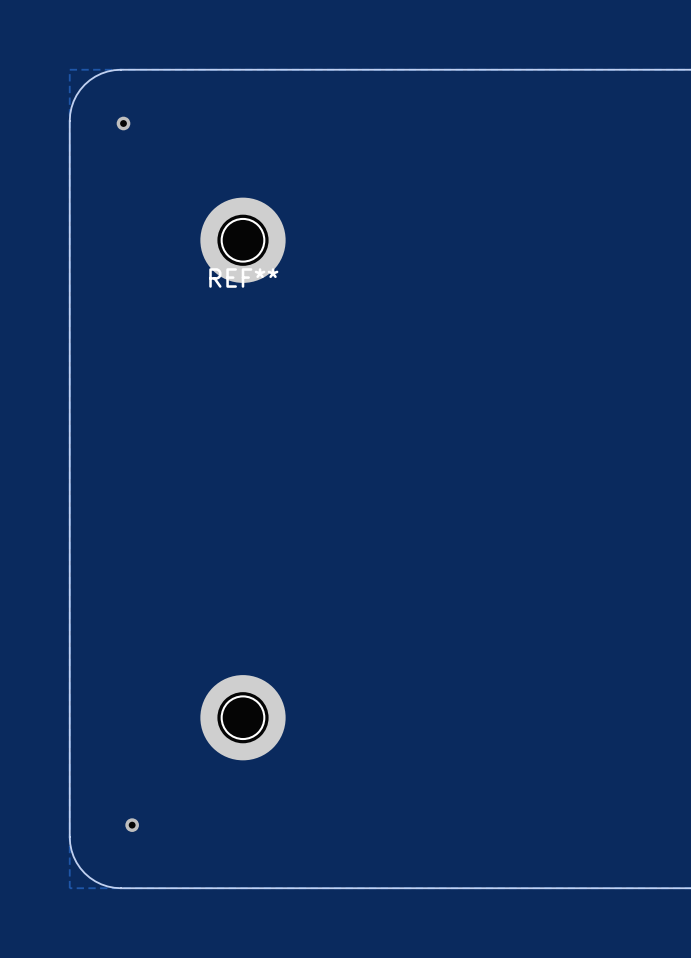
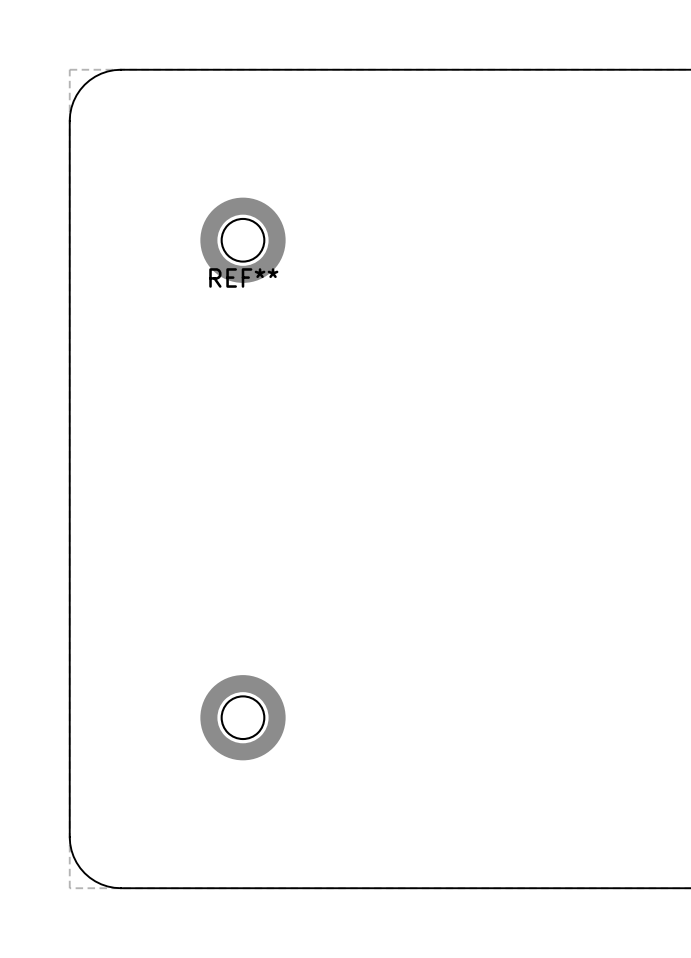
via: (123, 123) -> none
via: (132, 825) -> none

